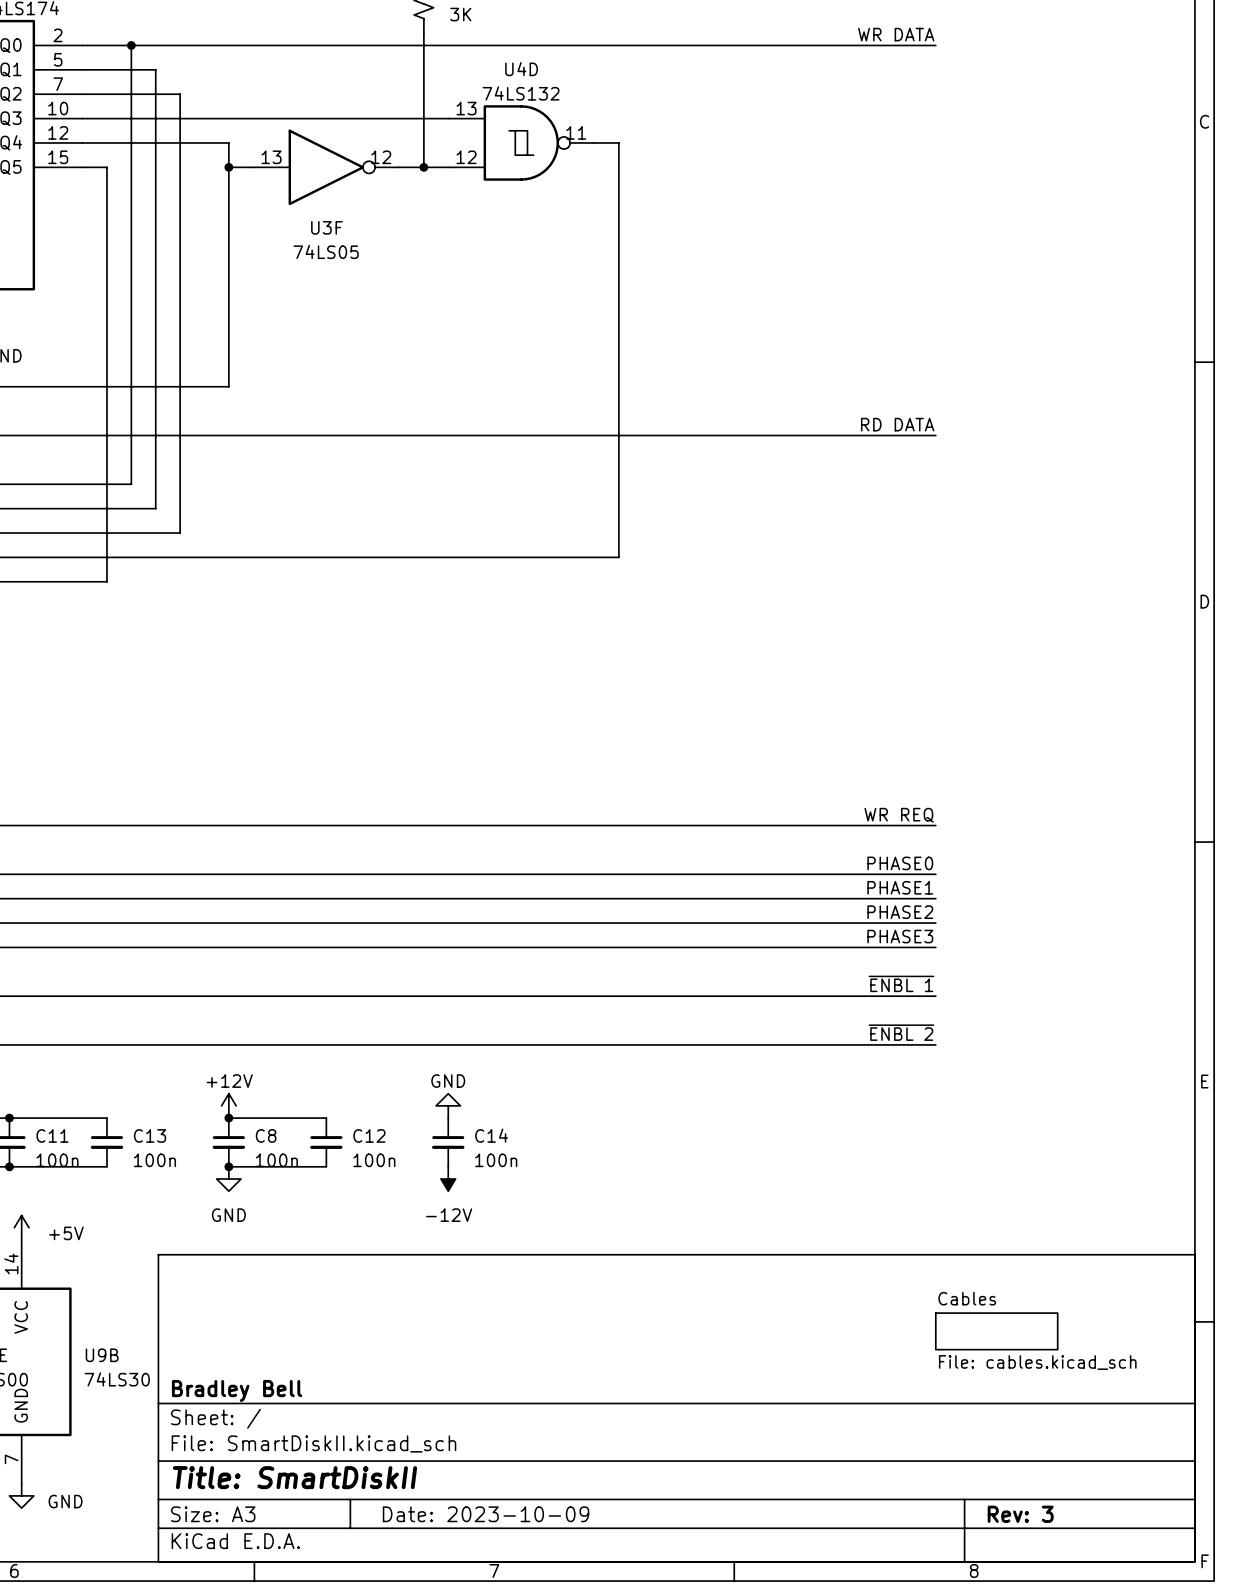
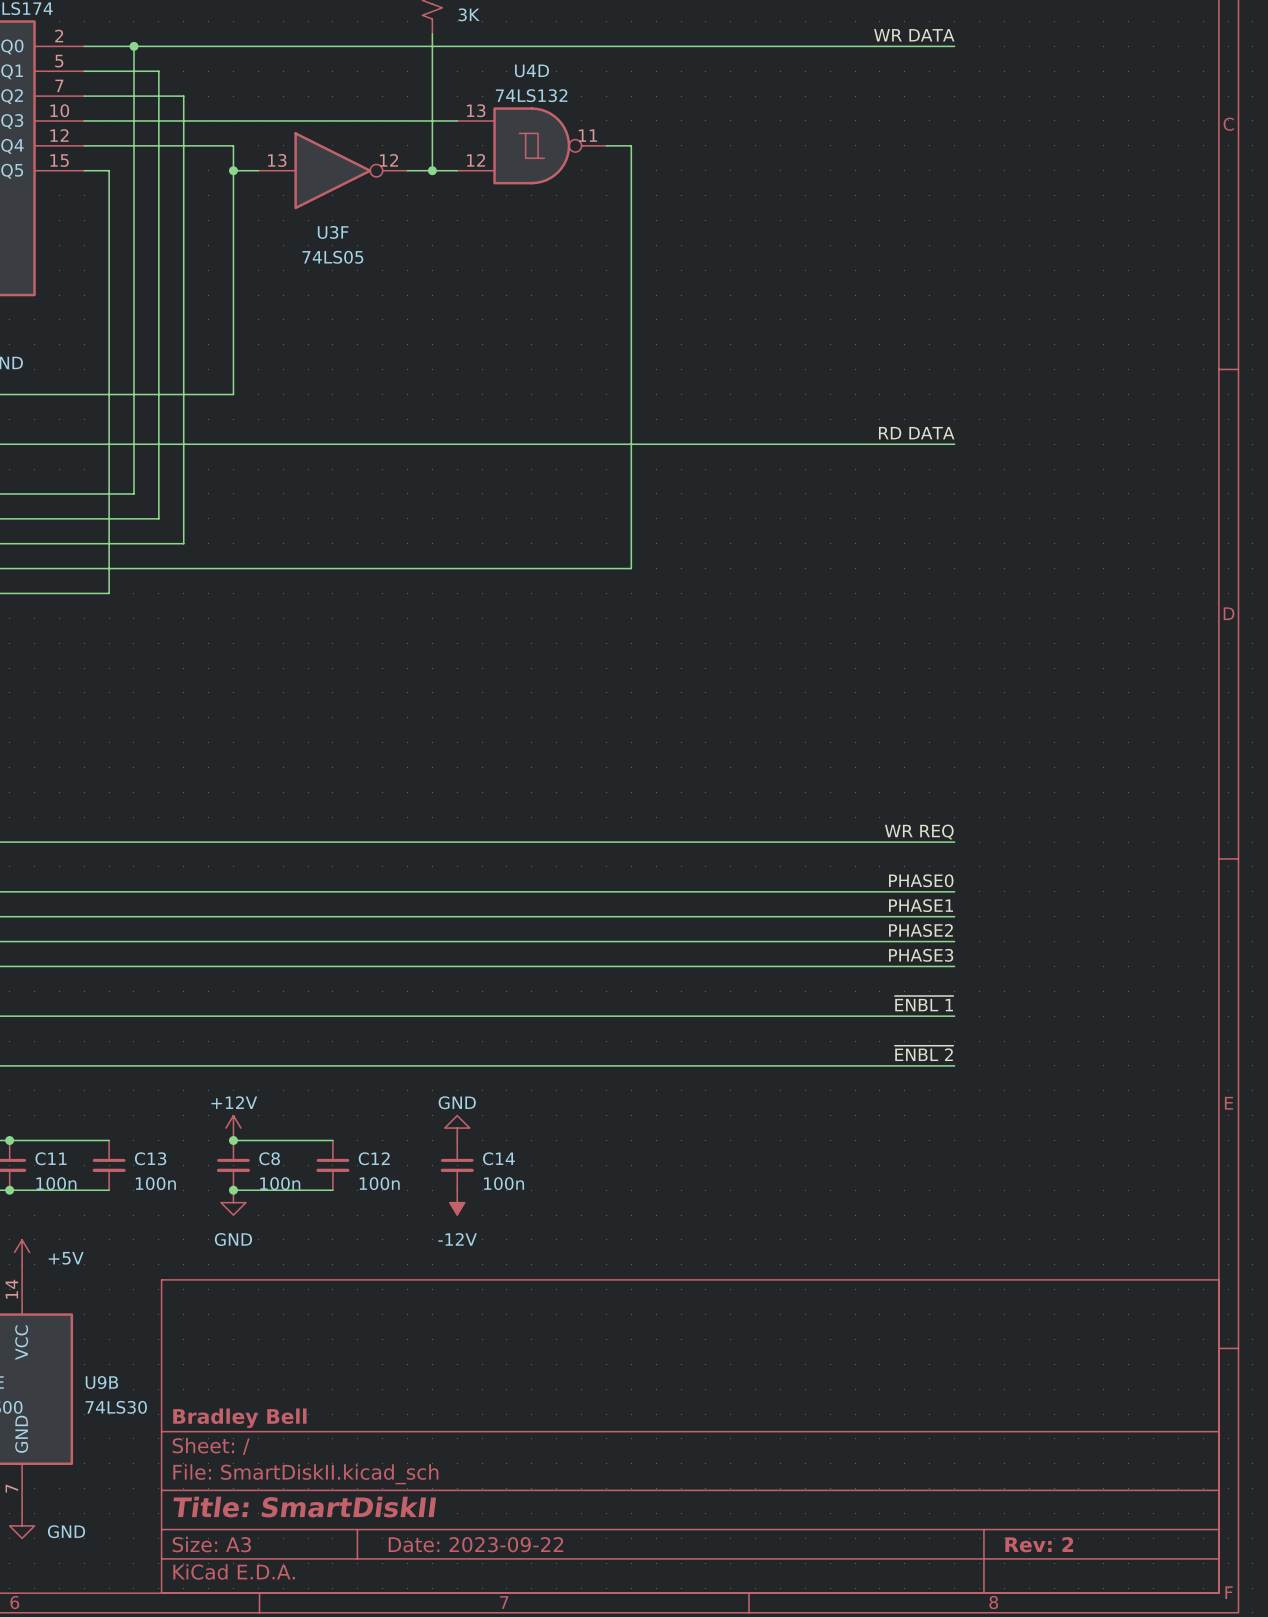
sheet Cables: File: cables.kicad_sch (996, 1331) -> none
title block: Date: 2023-10-09 (486, 1514) -> Date: 2023-09-22 (475, 1544)
title block: Rev: 3 (1020, 1514) -> Rev: 2 (1039, 1544)

